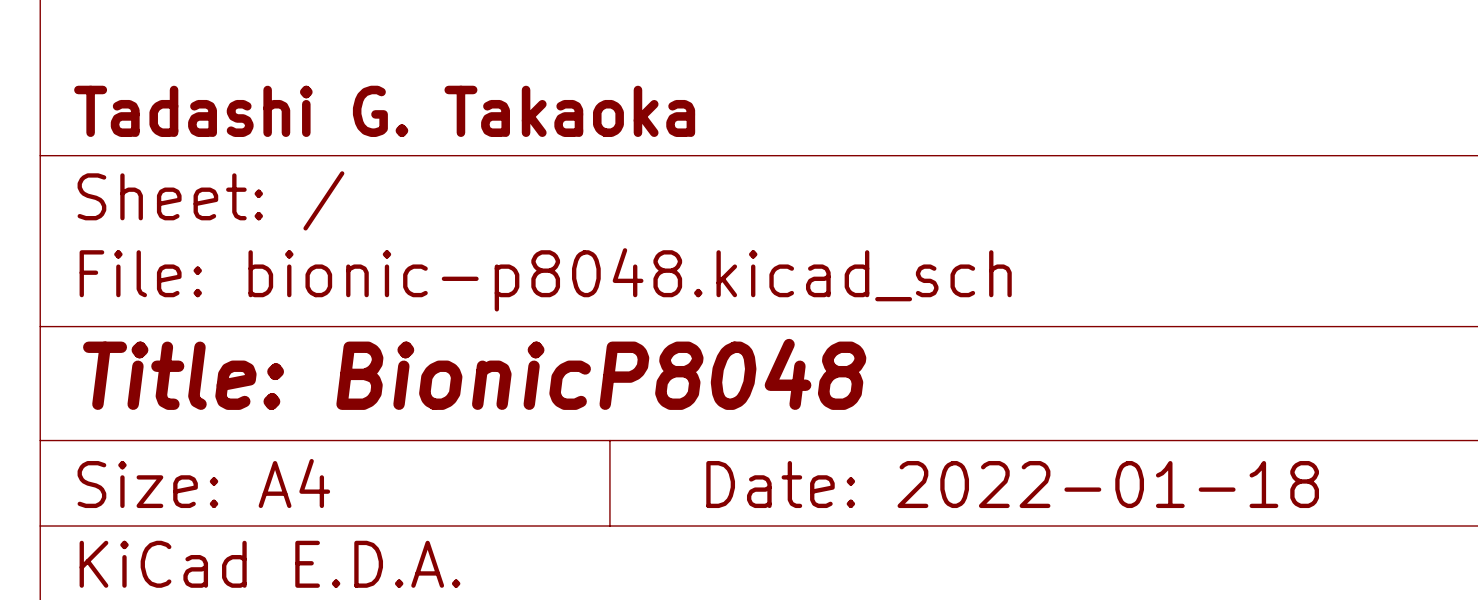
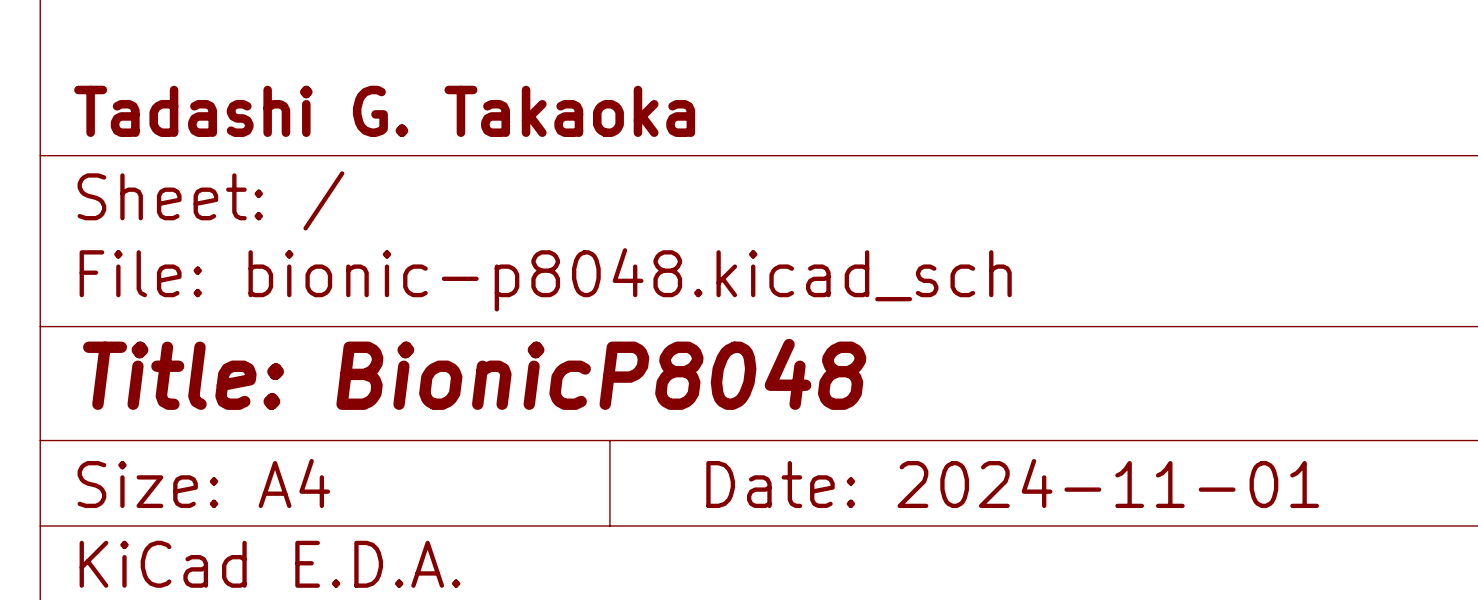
title block: Date: 2022-01-18 (1012, 484) -> Date: 2024-11-01 (1012, 483)

